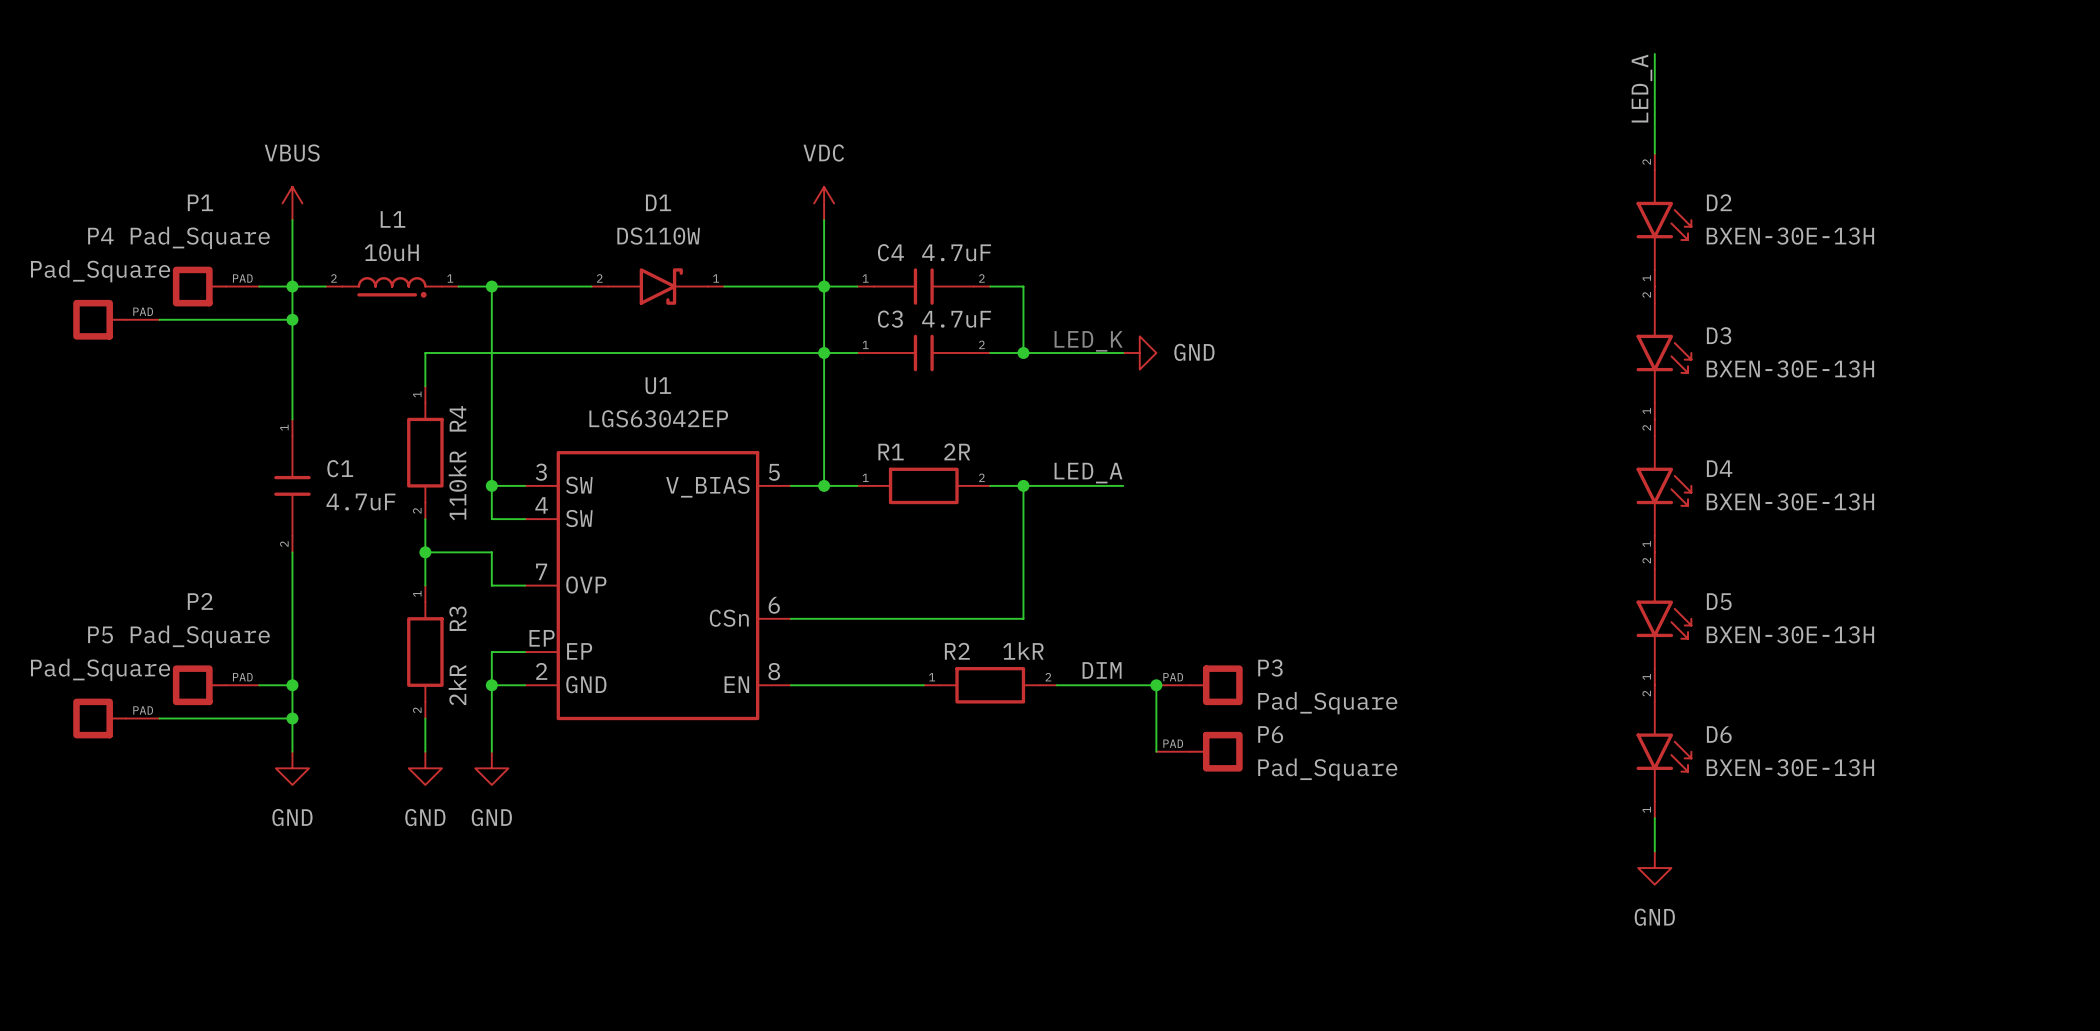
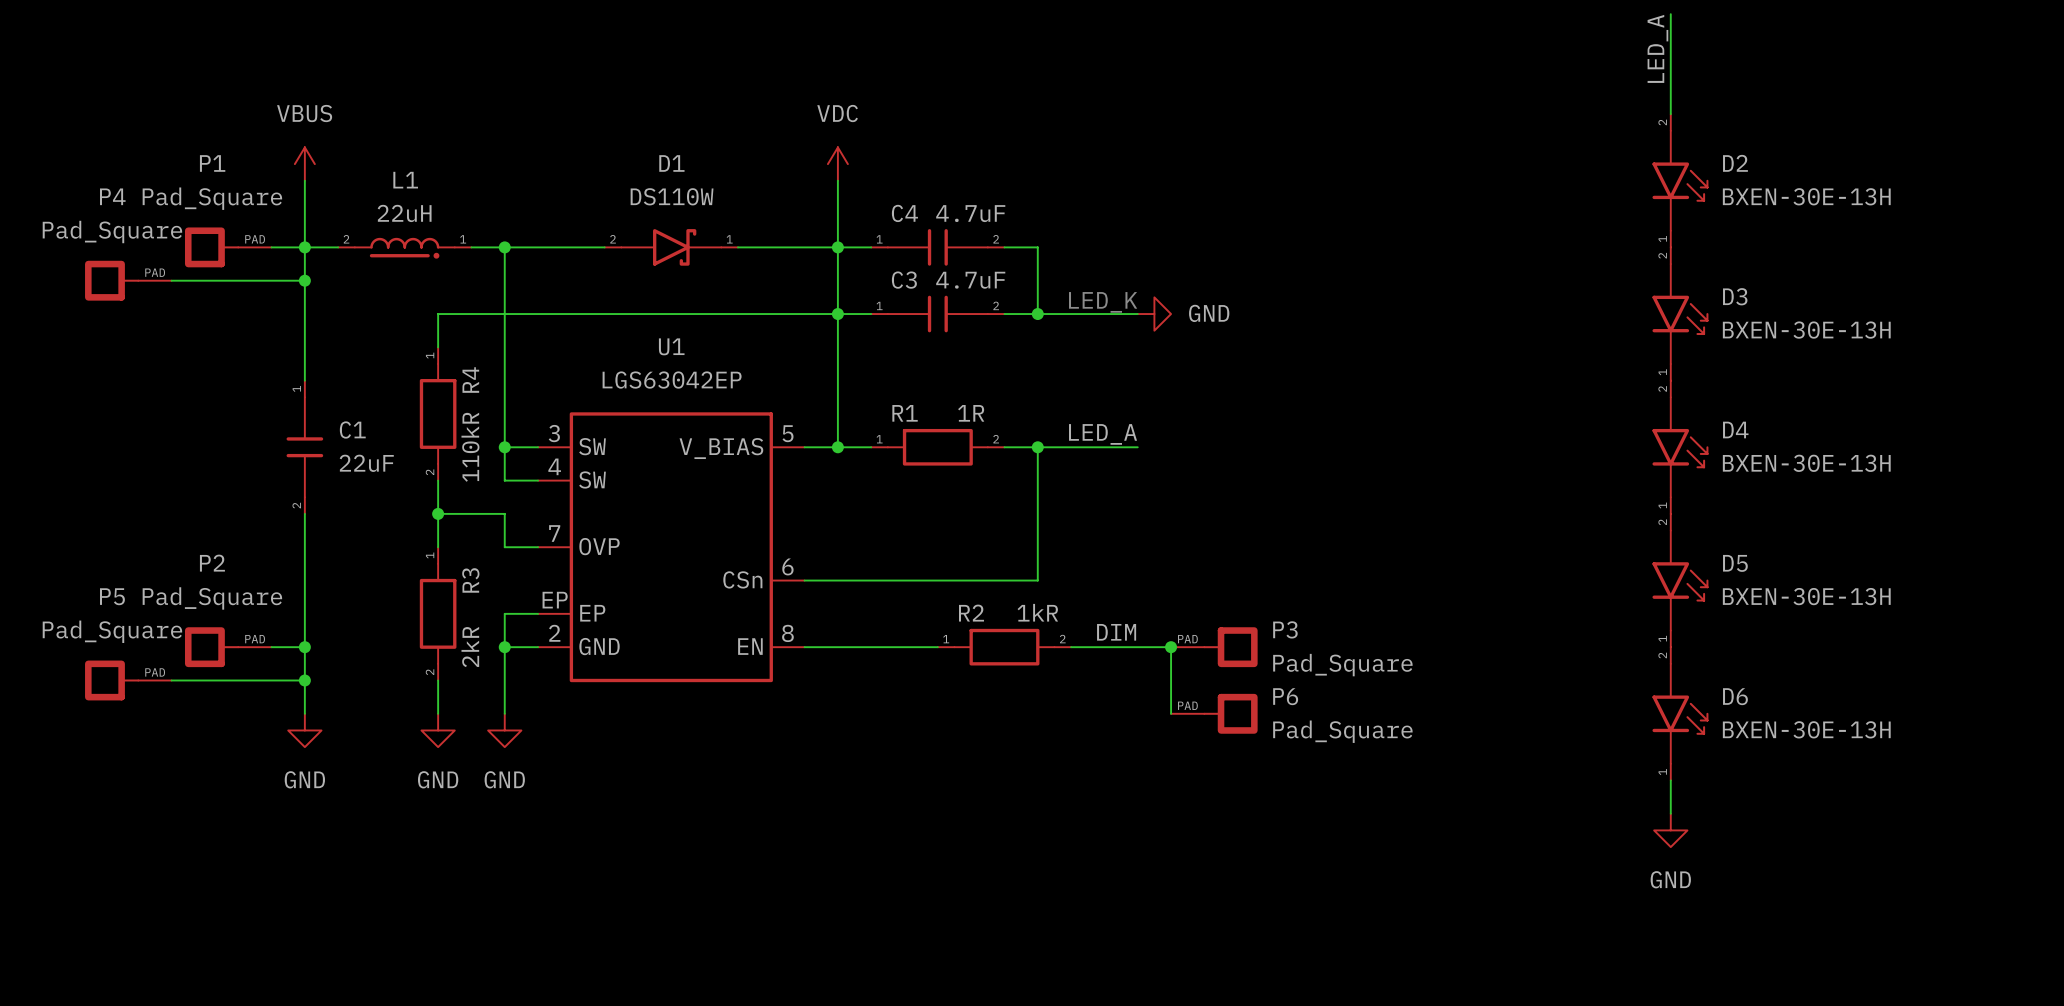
L1 value: 10uH (391, 252) -> 22uH (404, 213)
R1 value: 2R (957, 451) -> 1R (971, 413)
C1 value: 4.7uF (360, 502) -> 22uF (366, 463)

